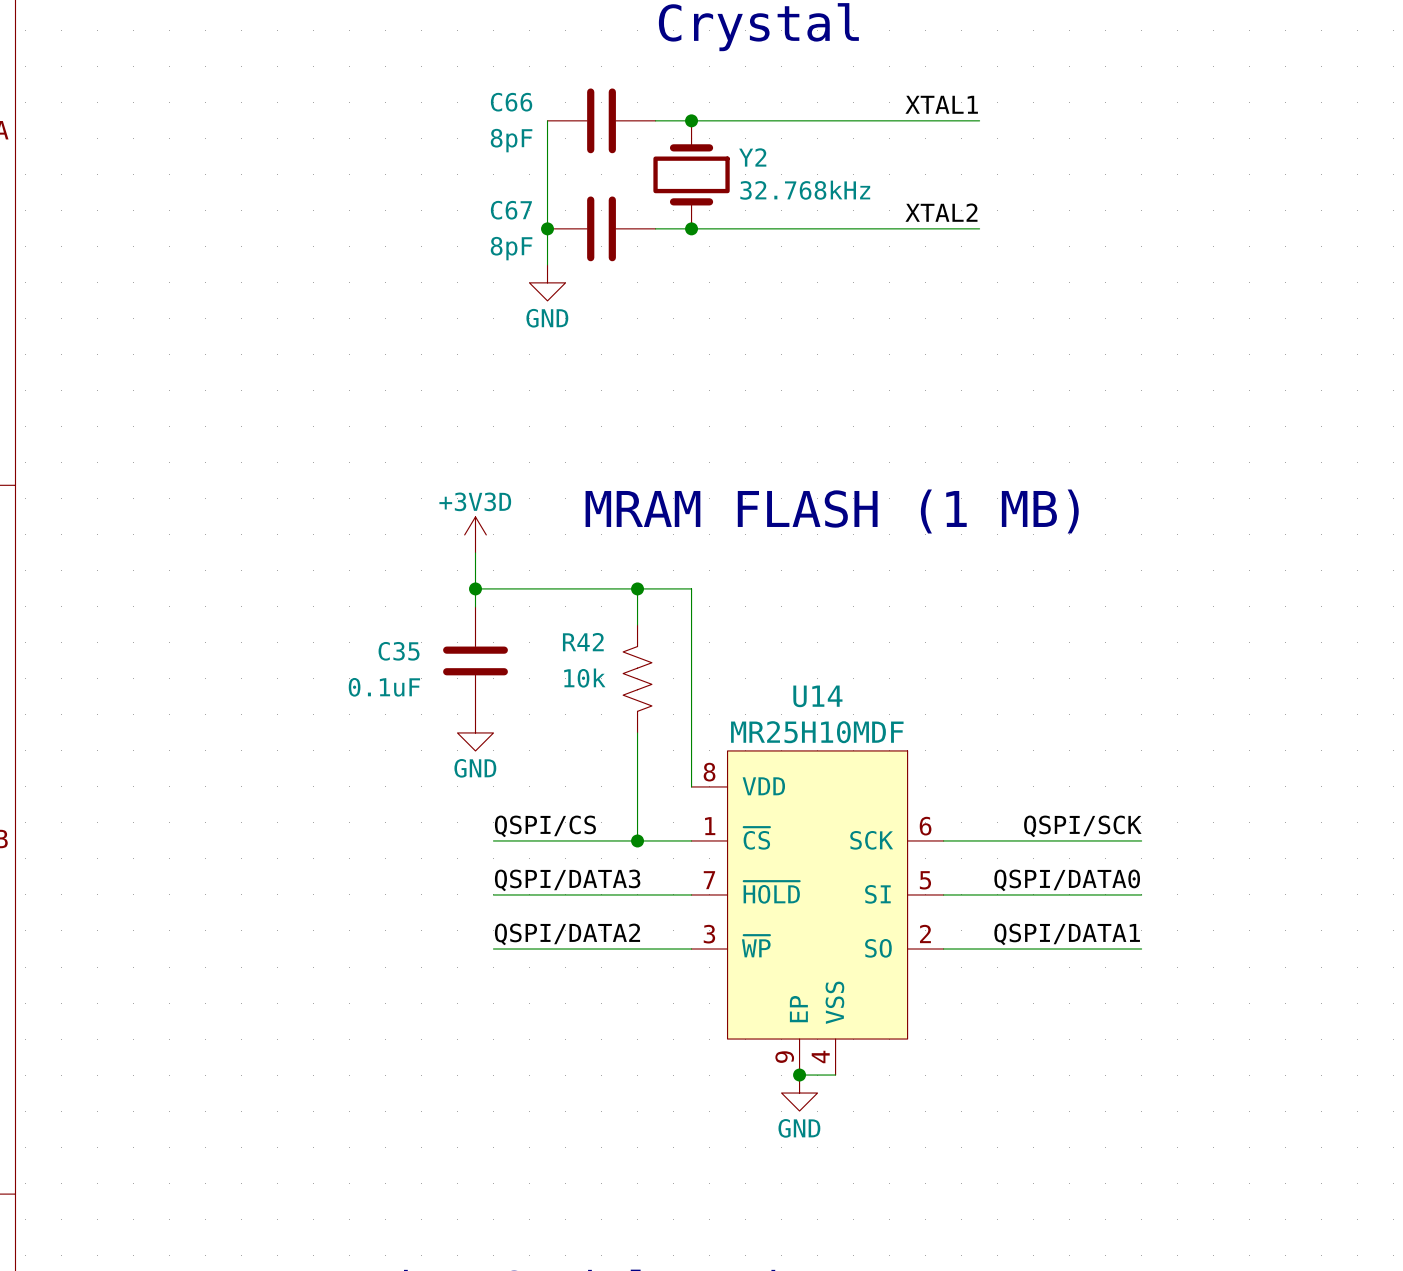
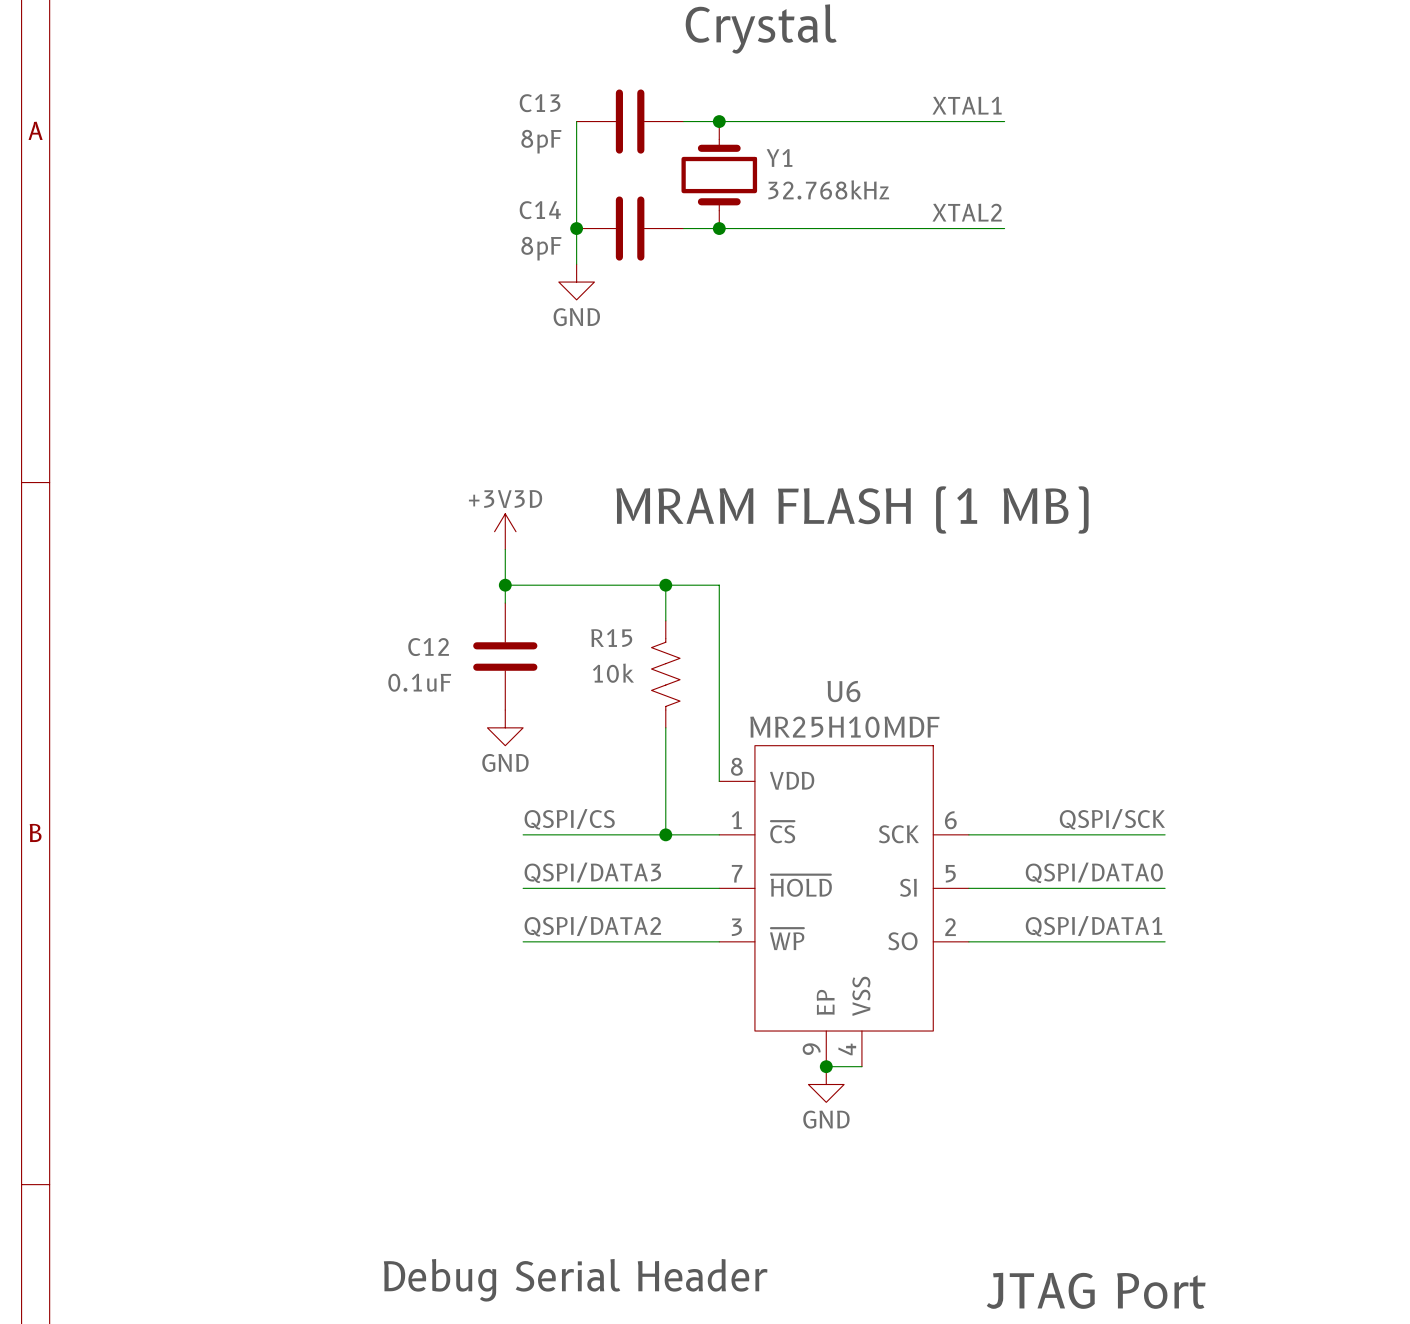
C66 name: C66 (511, 102) -> C13 (540, 103)
Y2 name: Y2 (752, 157) -> Y1 (779, 157)
C67 name: C67 (511, 210) -> C14 (540, 210)
R42 name: R42 (583, 642) -> R15 (611, 638)
C35 name: C35 (399, 651) -> C12 (428, 647)
U14 name: U14 (817, 696) -> U6 (843, 691)

